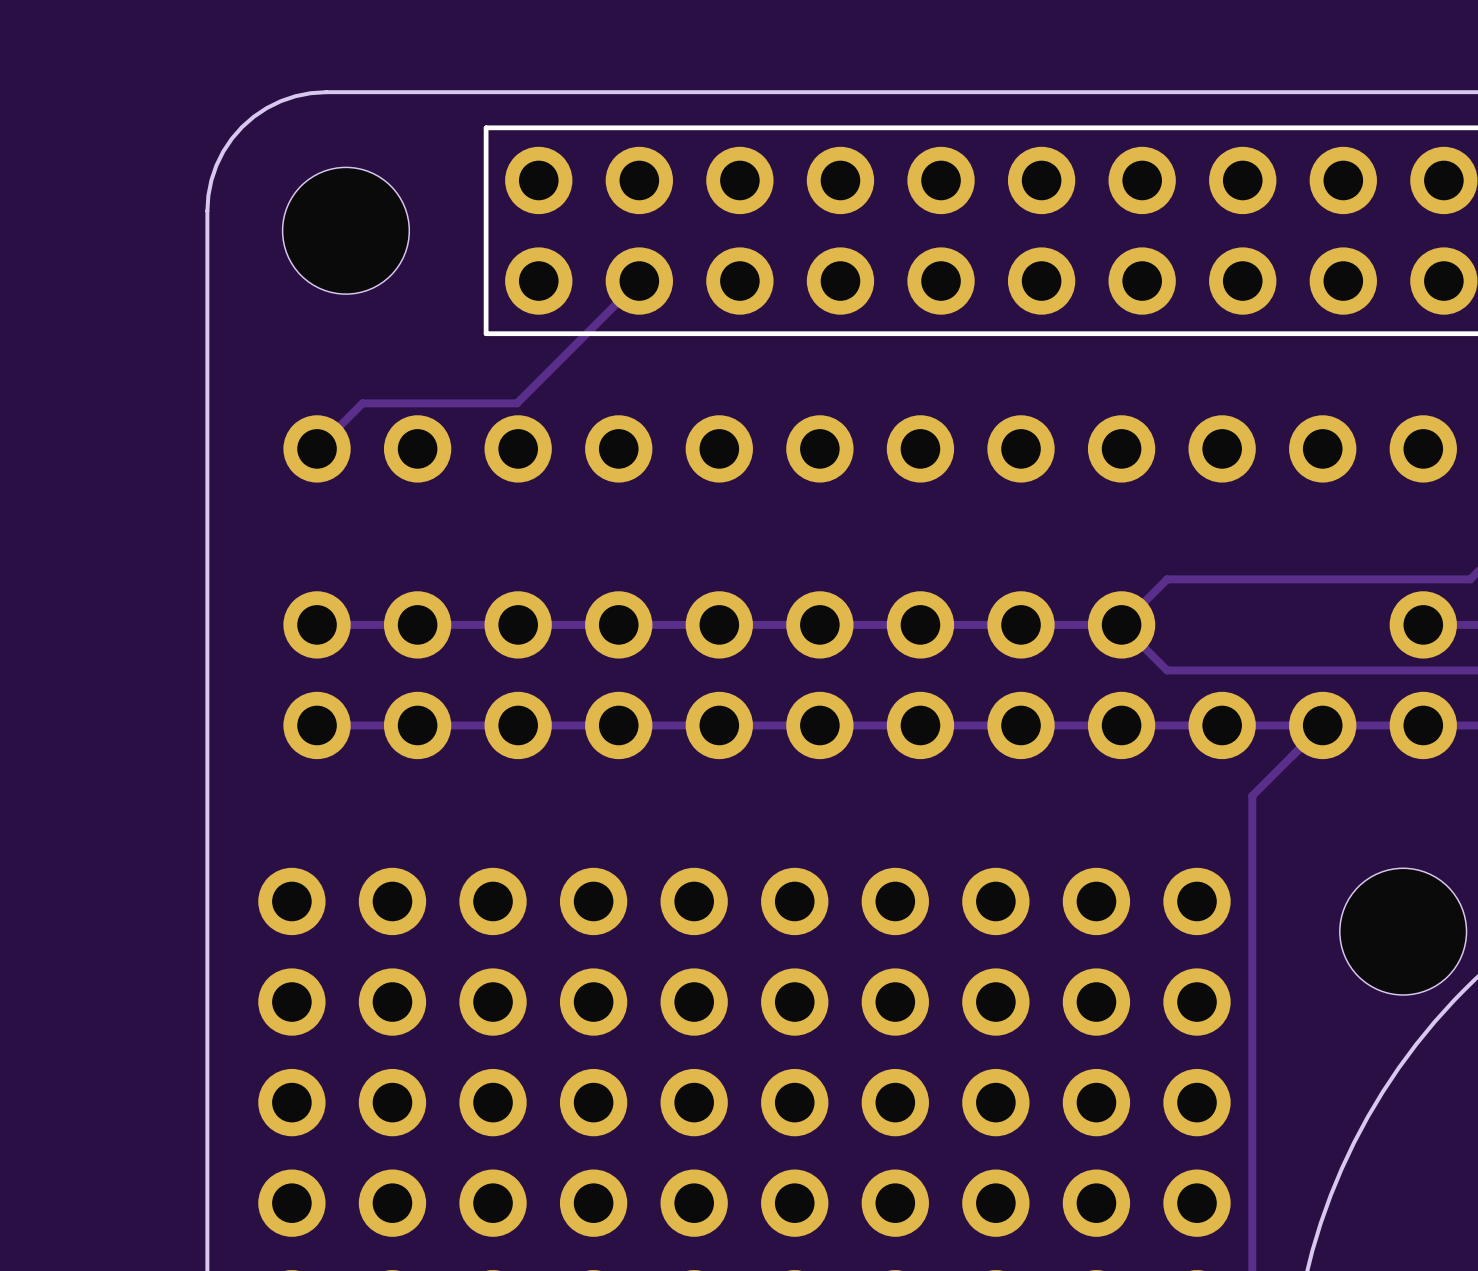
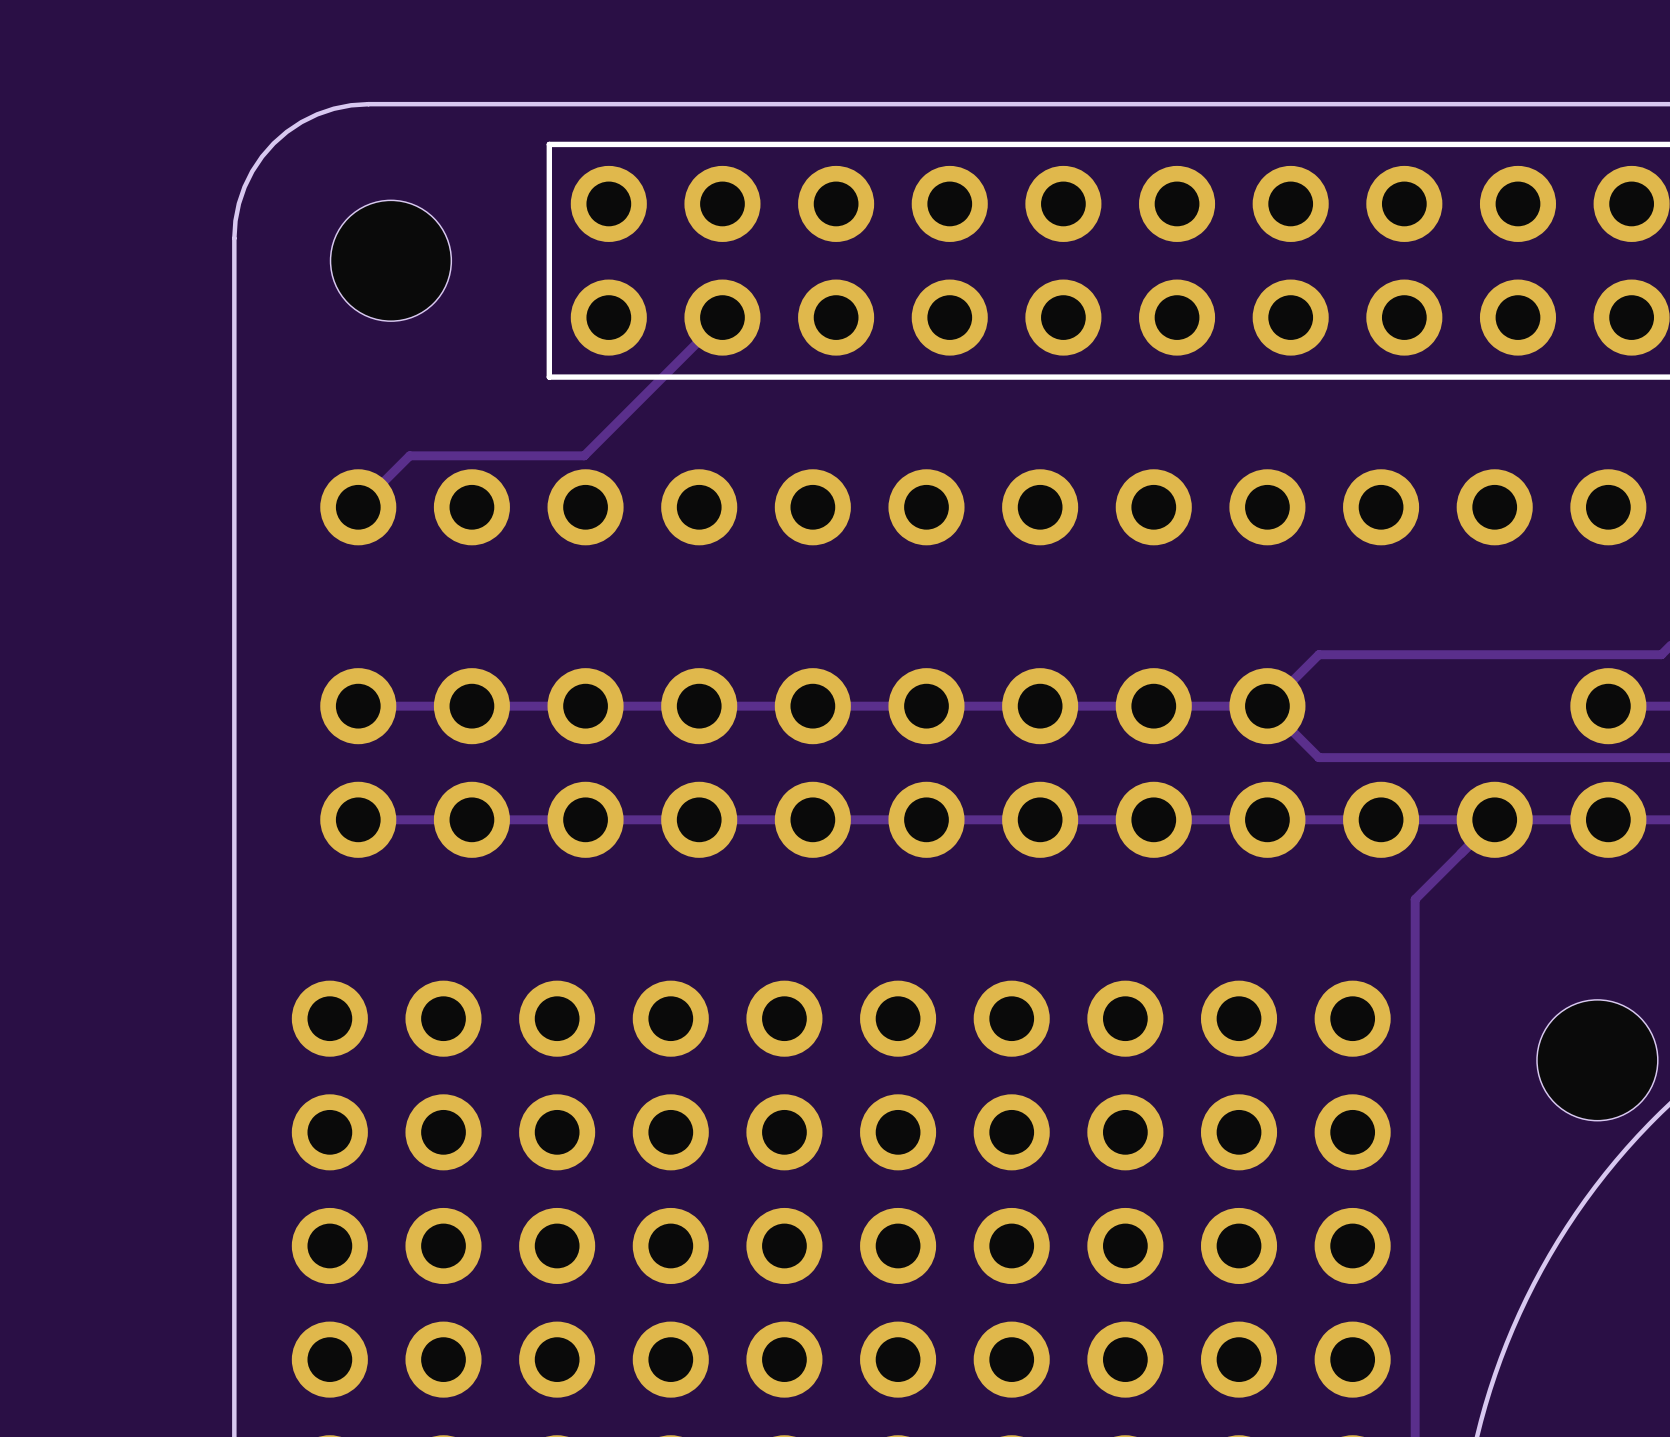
part footprint: [282, 167, 410, 295] -> [330, 200, 452, 322]
part footprint: [1339, 868, 1467, 995] -> [1537, 999, 1658, 1121]

